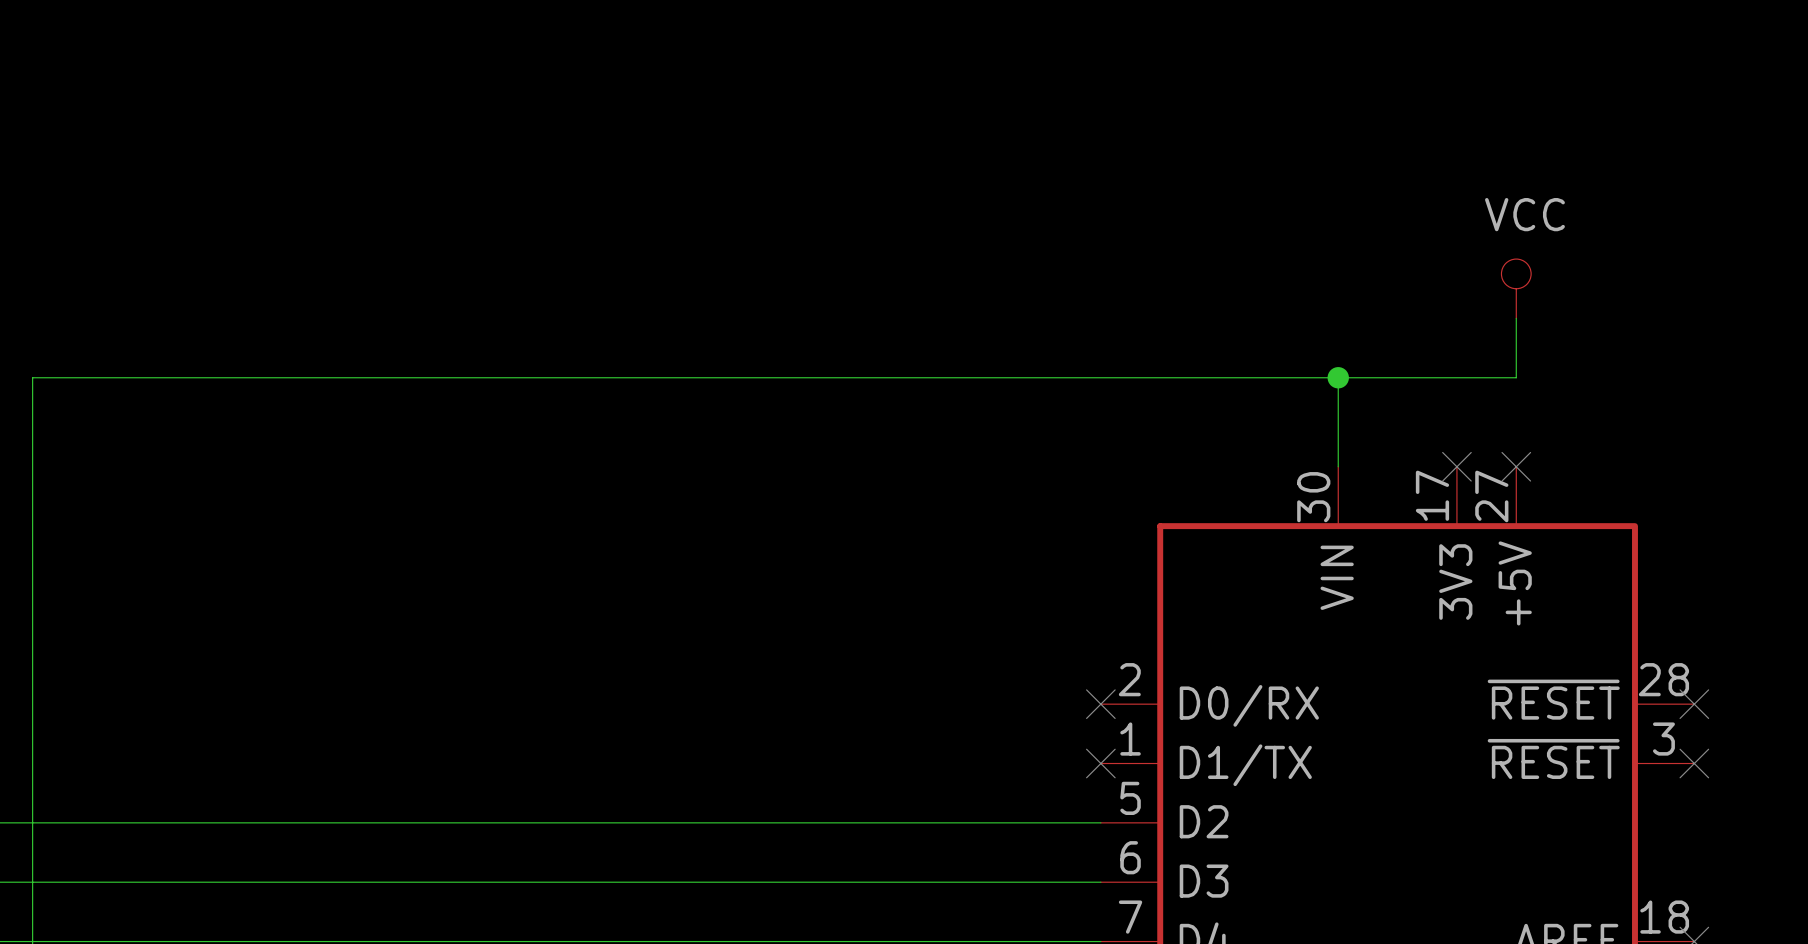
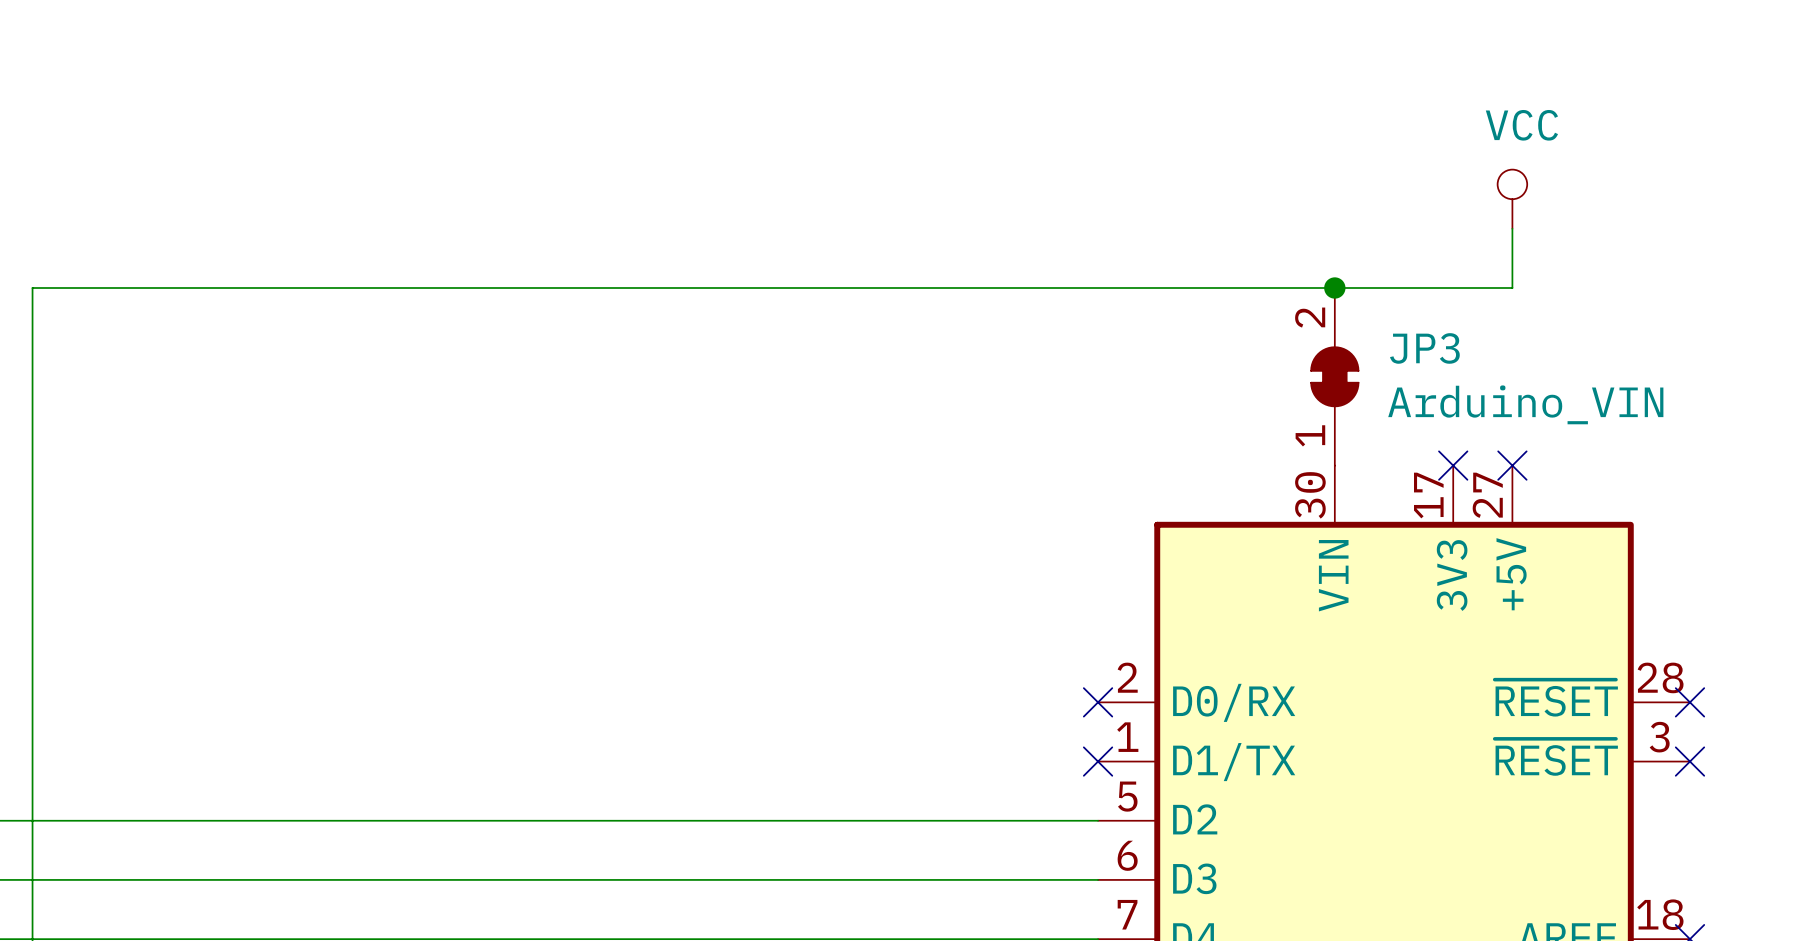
power symbol position: VCC (1516, 288) -> VCC (1512, 199)
wire: (1516, 318) (1516, 377) (32, 377) -> (1512, 228) (1512, 287) (32, 287) (32, 376)
JP3: none -> Arduino_VIN (1334, 376)
junction position: (1338, 377) -> (1334, 287)

